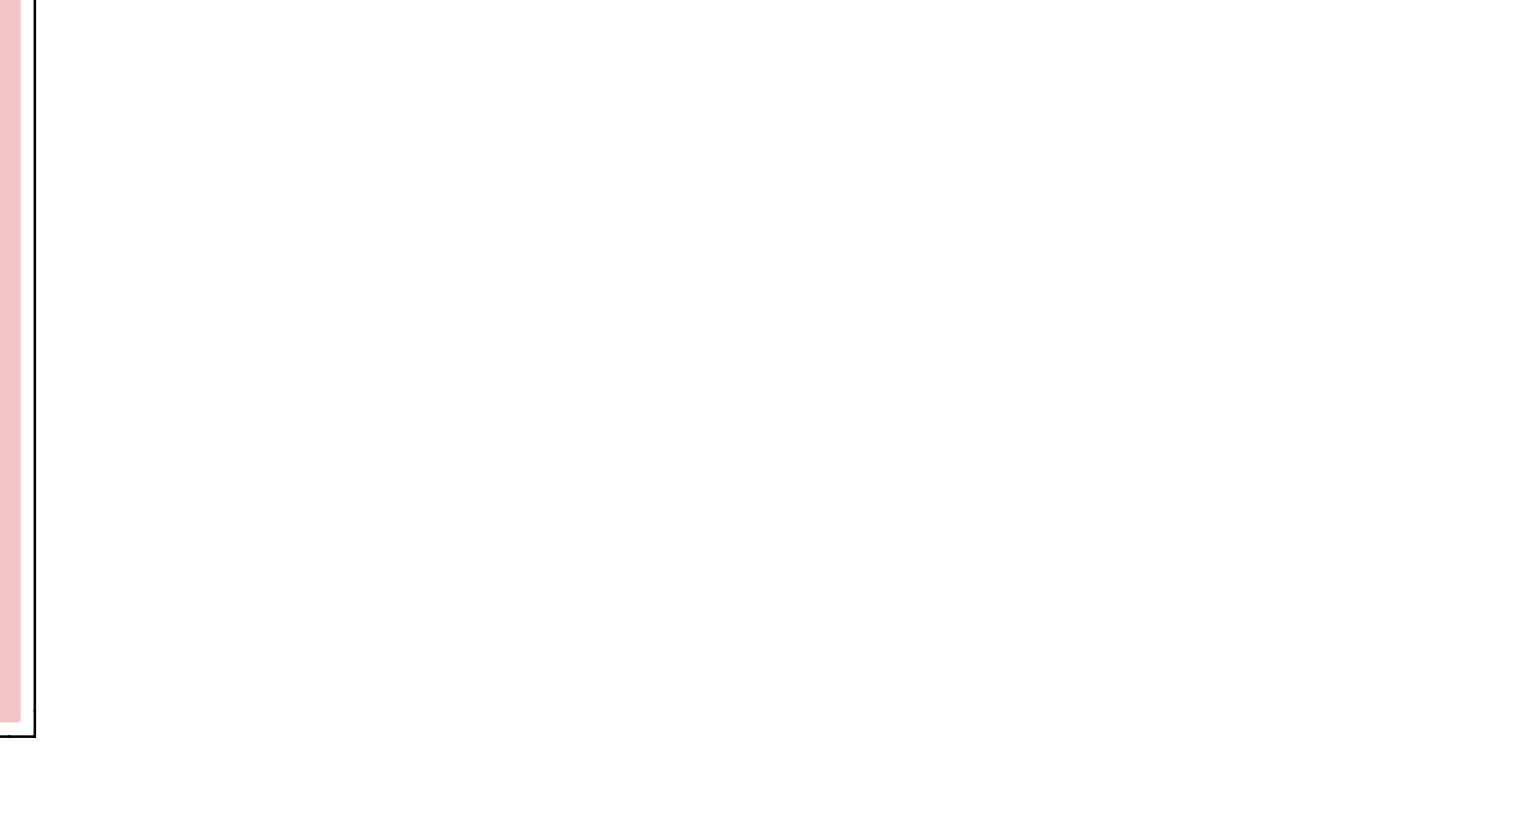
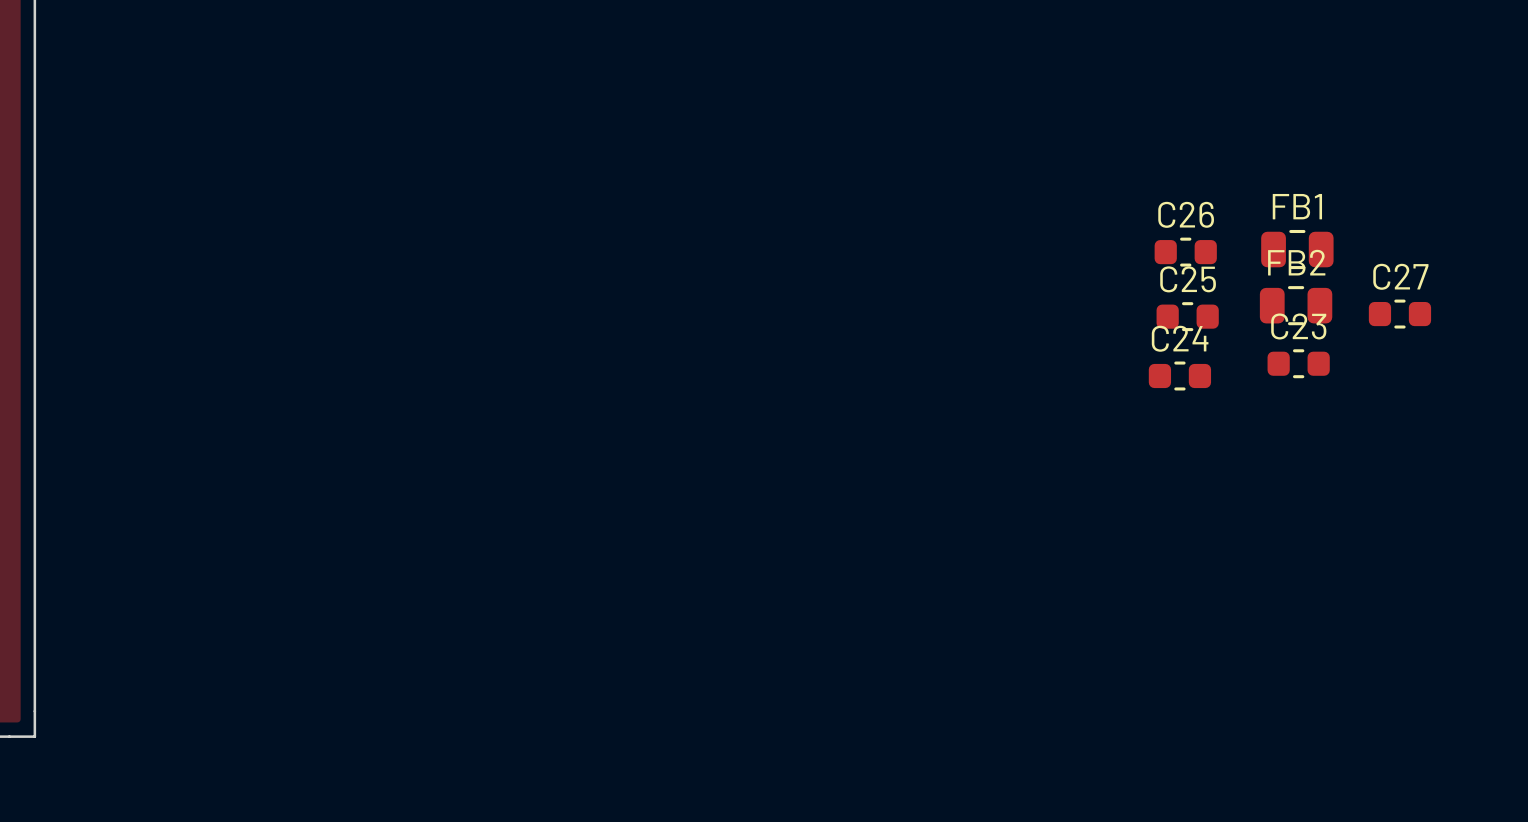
FB1: none -> (1297, 249)
C26: none -> (1185, 252)
FB2: none -> (1296, 305)
C27: none -> (1399, 314)
C25: none -> (1187, 316)
C23: none -> (1298, 363)
C24: none -> (1179, 375)

